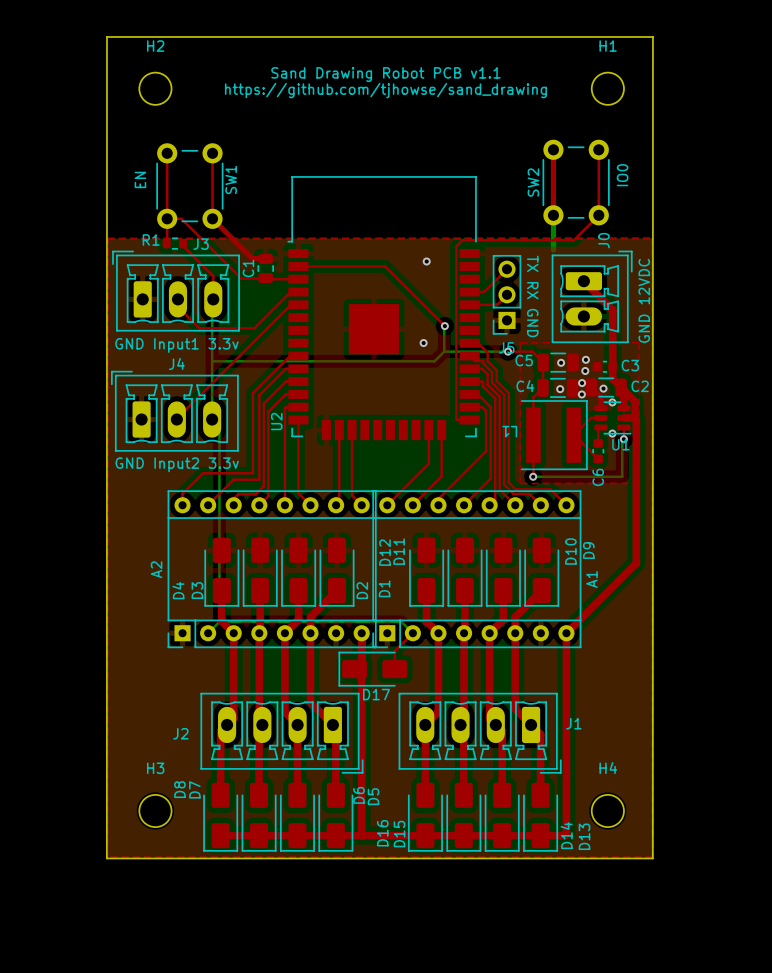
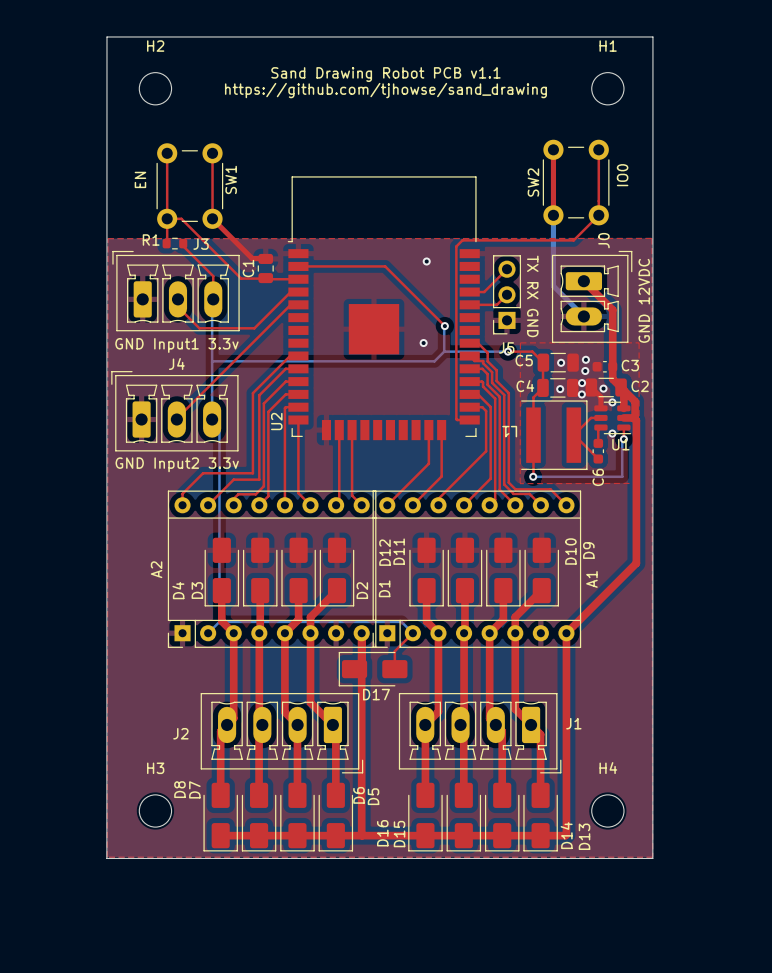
bottom track: none -> (553, 249) (553, 286) (583, 316)

